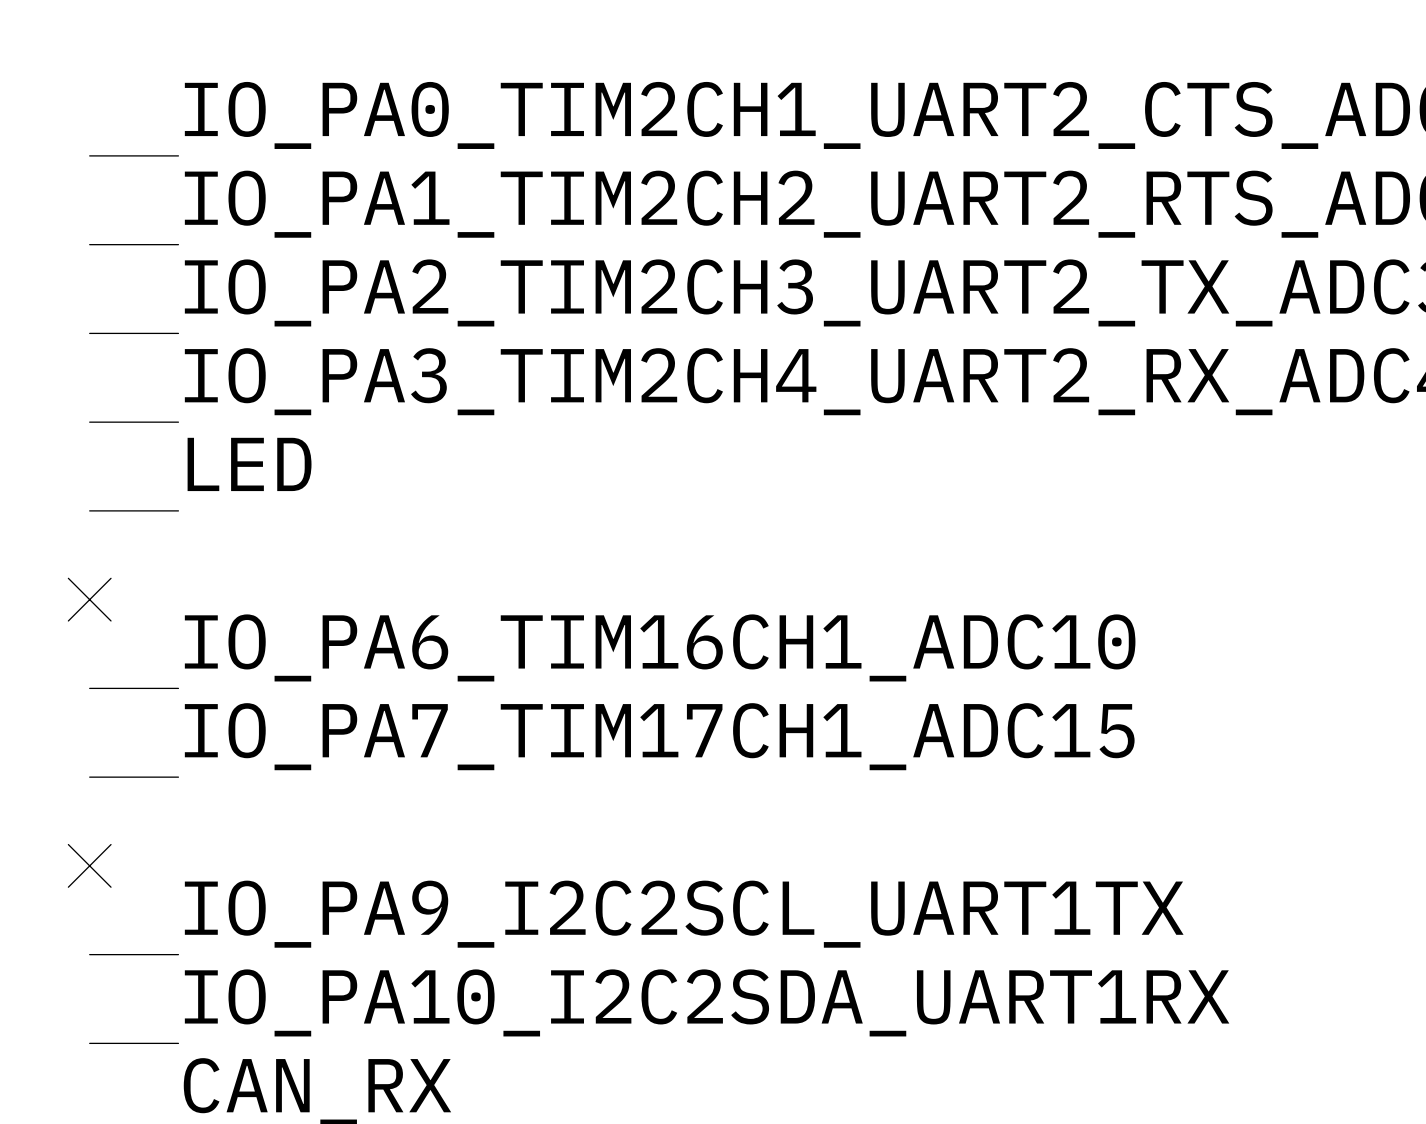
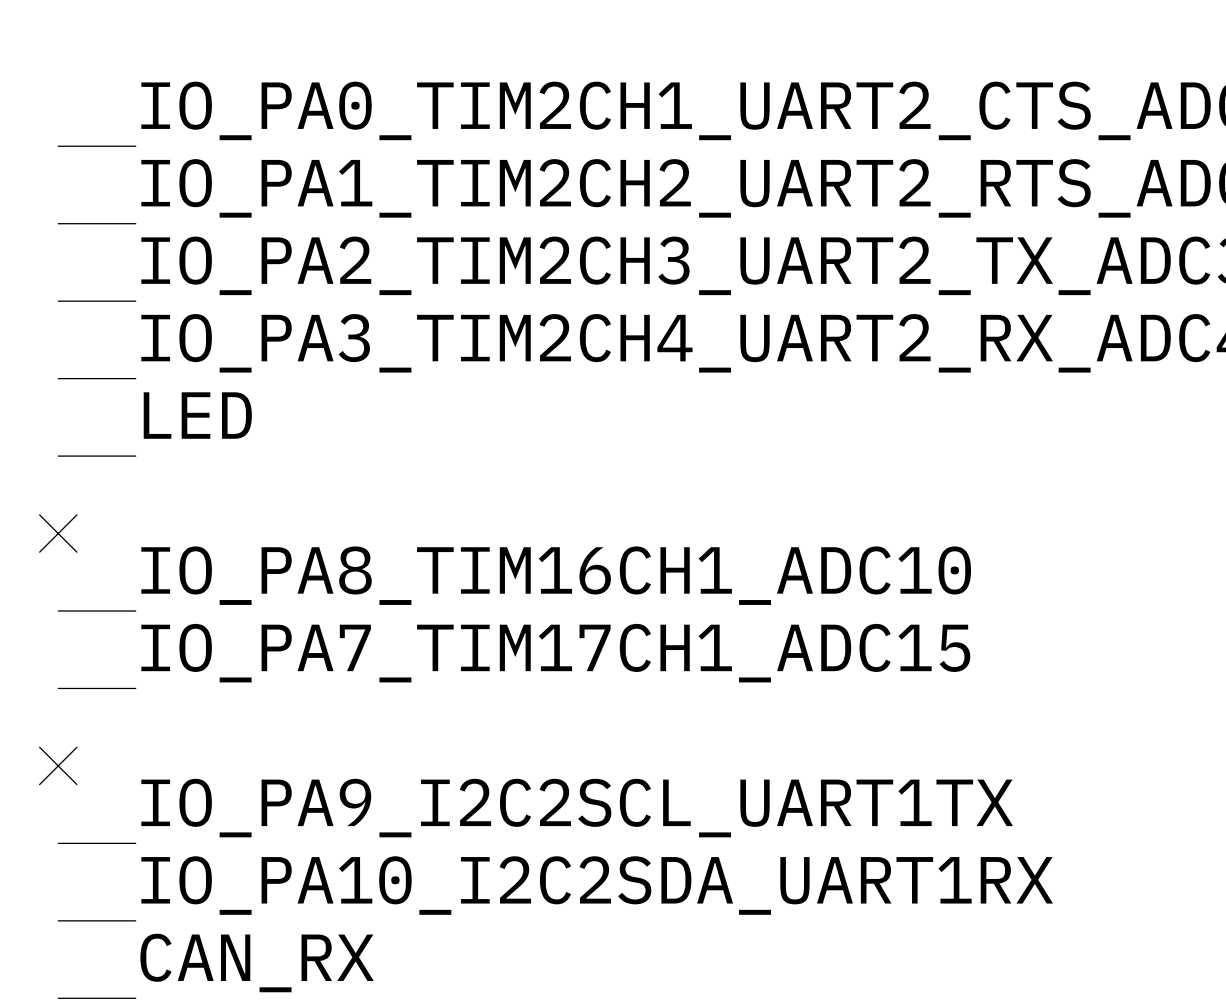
label: IO_PA6_TIM16CH1_ADC10 (660, 647) -> IO_PA8_TIM16CH1_ADC10 (556, 575)

